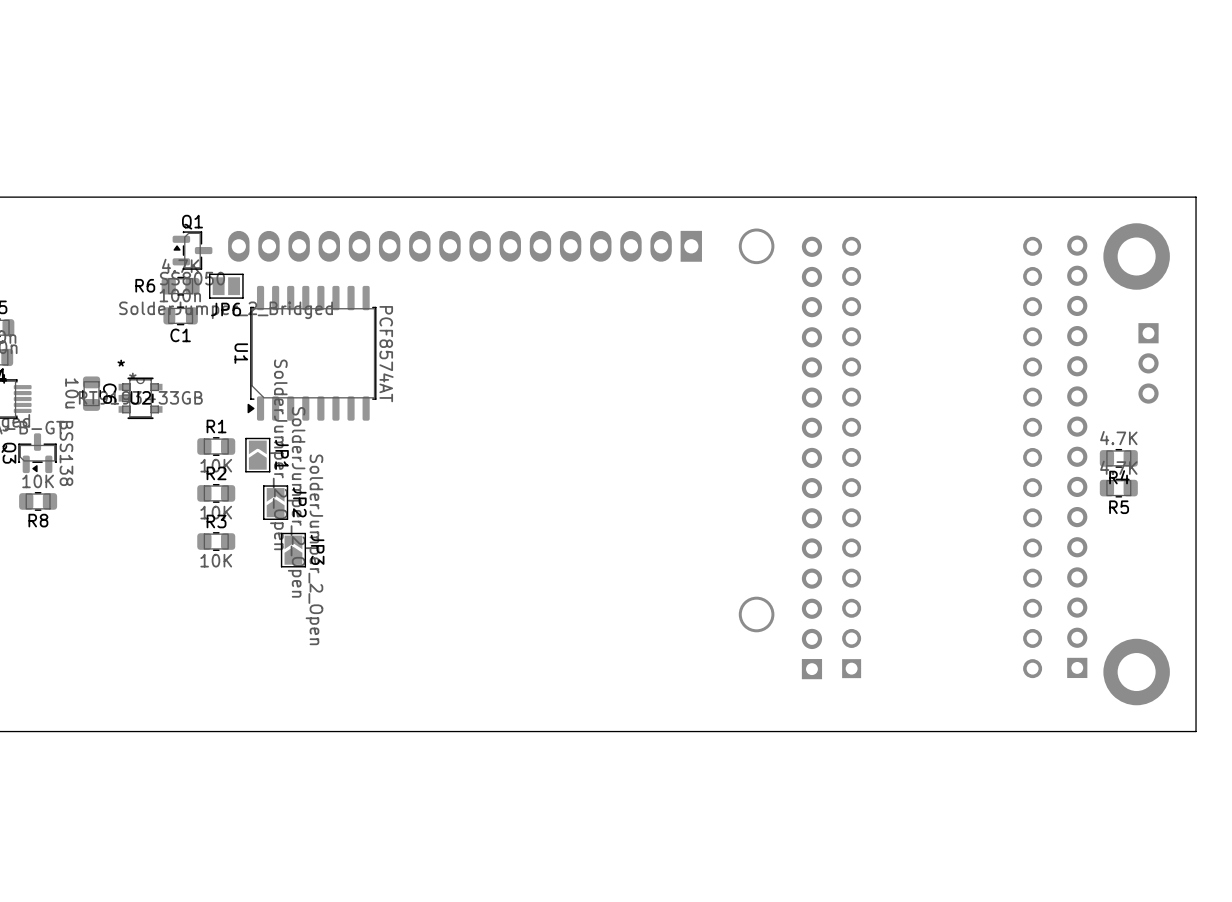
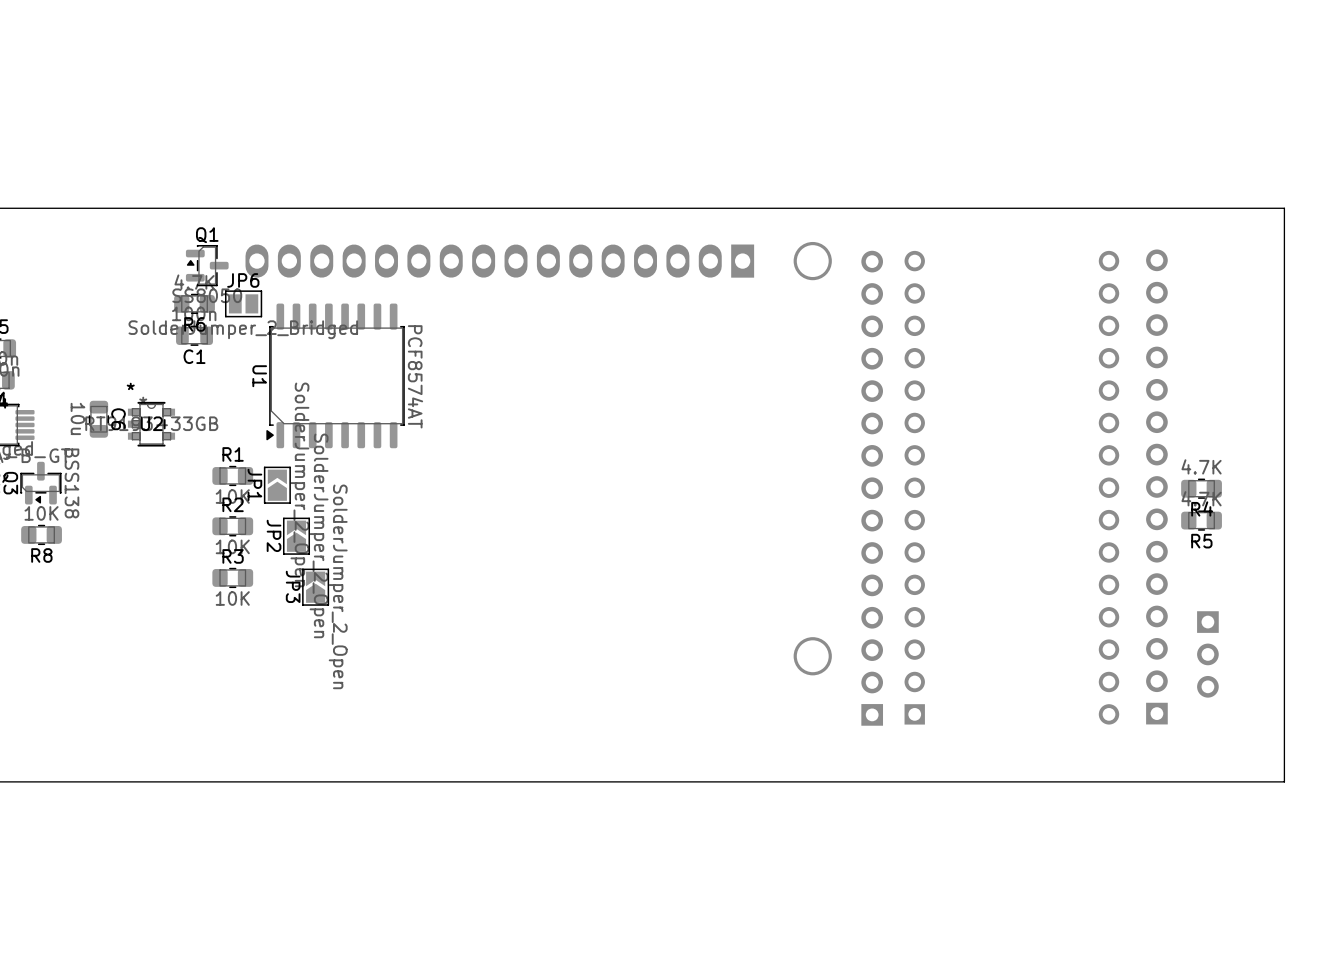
part: (1136, 256) -> none
R6 name position: R6 (145, 285) -> R6 (194, 324)
JP6 name position: JP6 (226, 309) -> JP6 (243, 280)
part position: (1148, 363) -> (1207, 654)
JP1 name position: JP1 (282, 454) -> JP1 (254, 484)
JP2 name position: JP2 (299, 502) -> JP2 (274, 535)
JP3 name position: JP3 (317, 549) -> JP3 (293, 586)
part: (1136, 672) -> none

